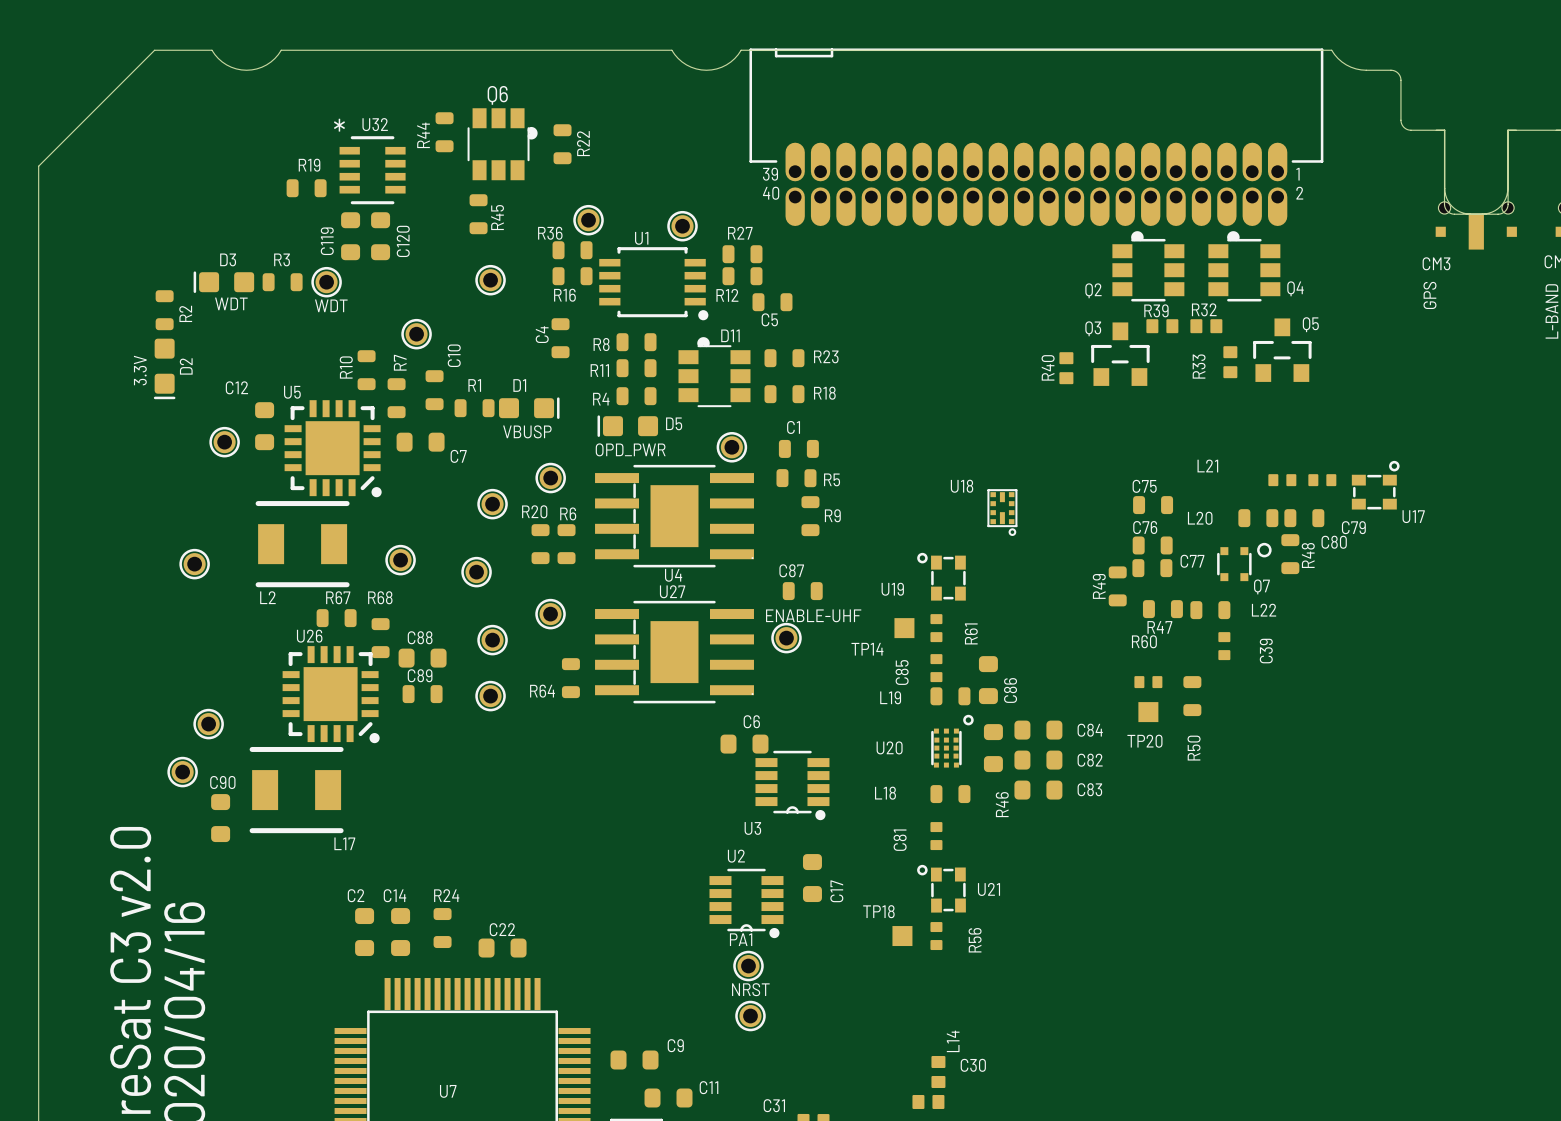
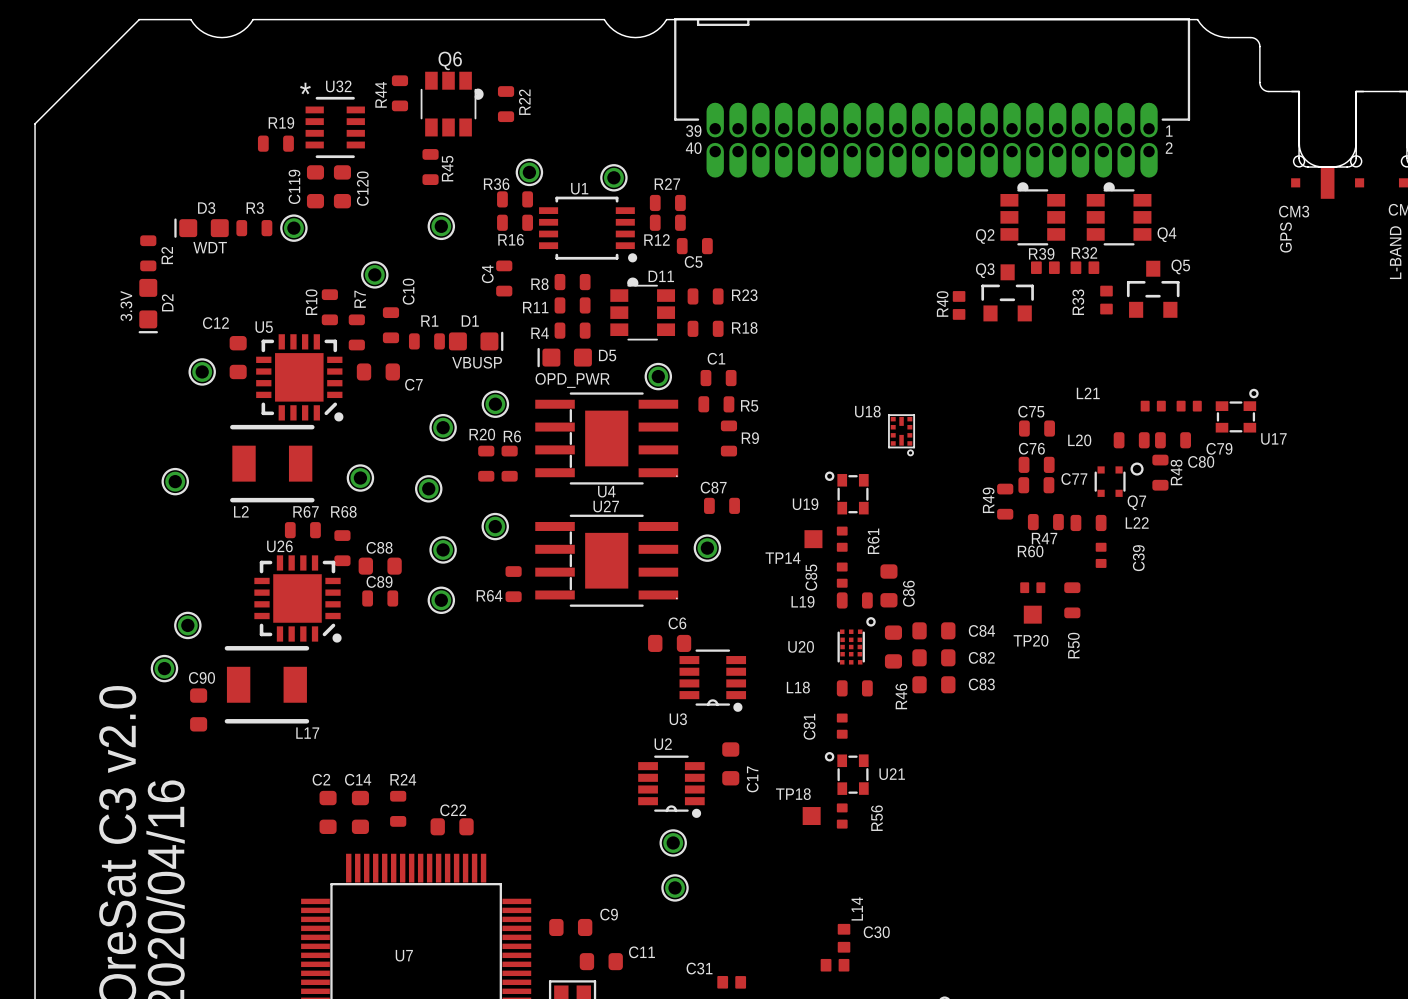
WDT name: WDT (331, 305) -> none
ENABLE-UHF name: ENABLE-UHF (813, 615) -> none
PA1 name: PA1 (741, 939) -> none
NRST name: NRST (750, 989) -> none

